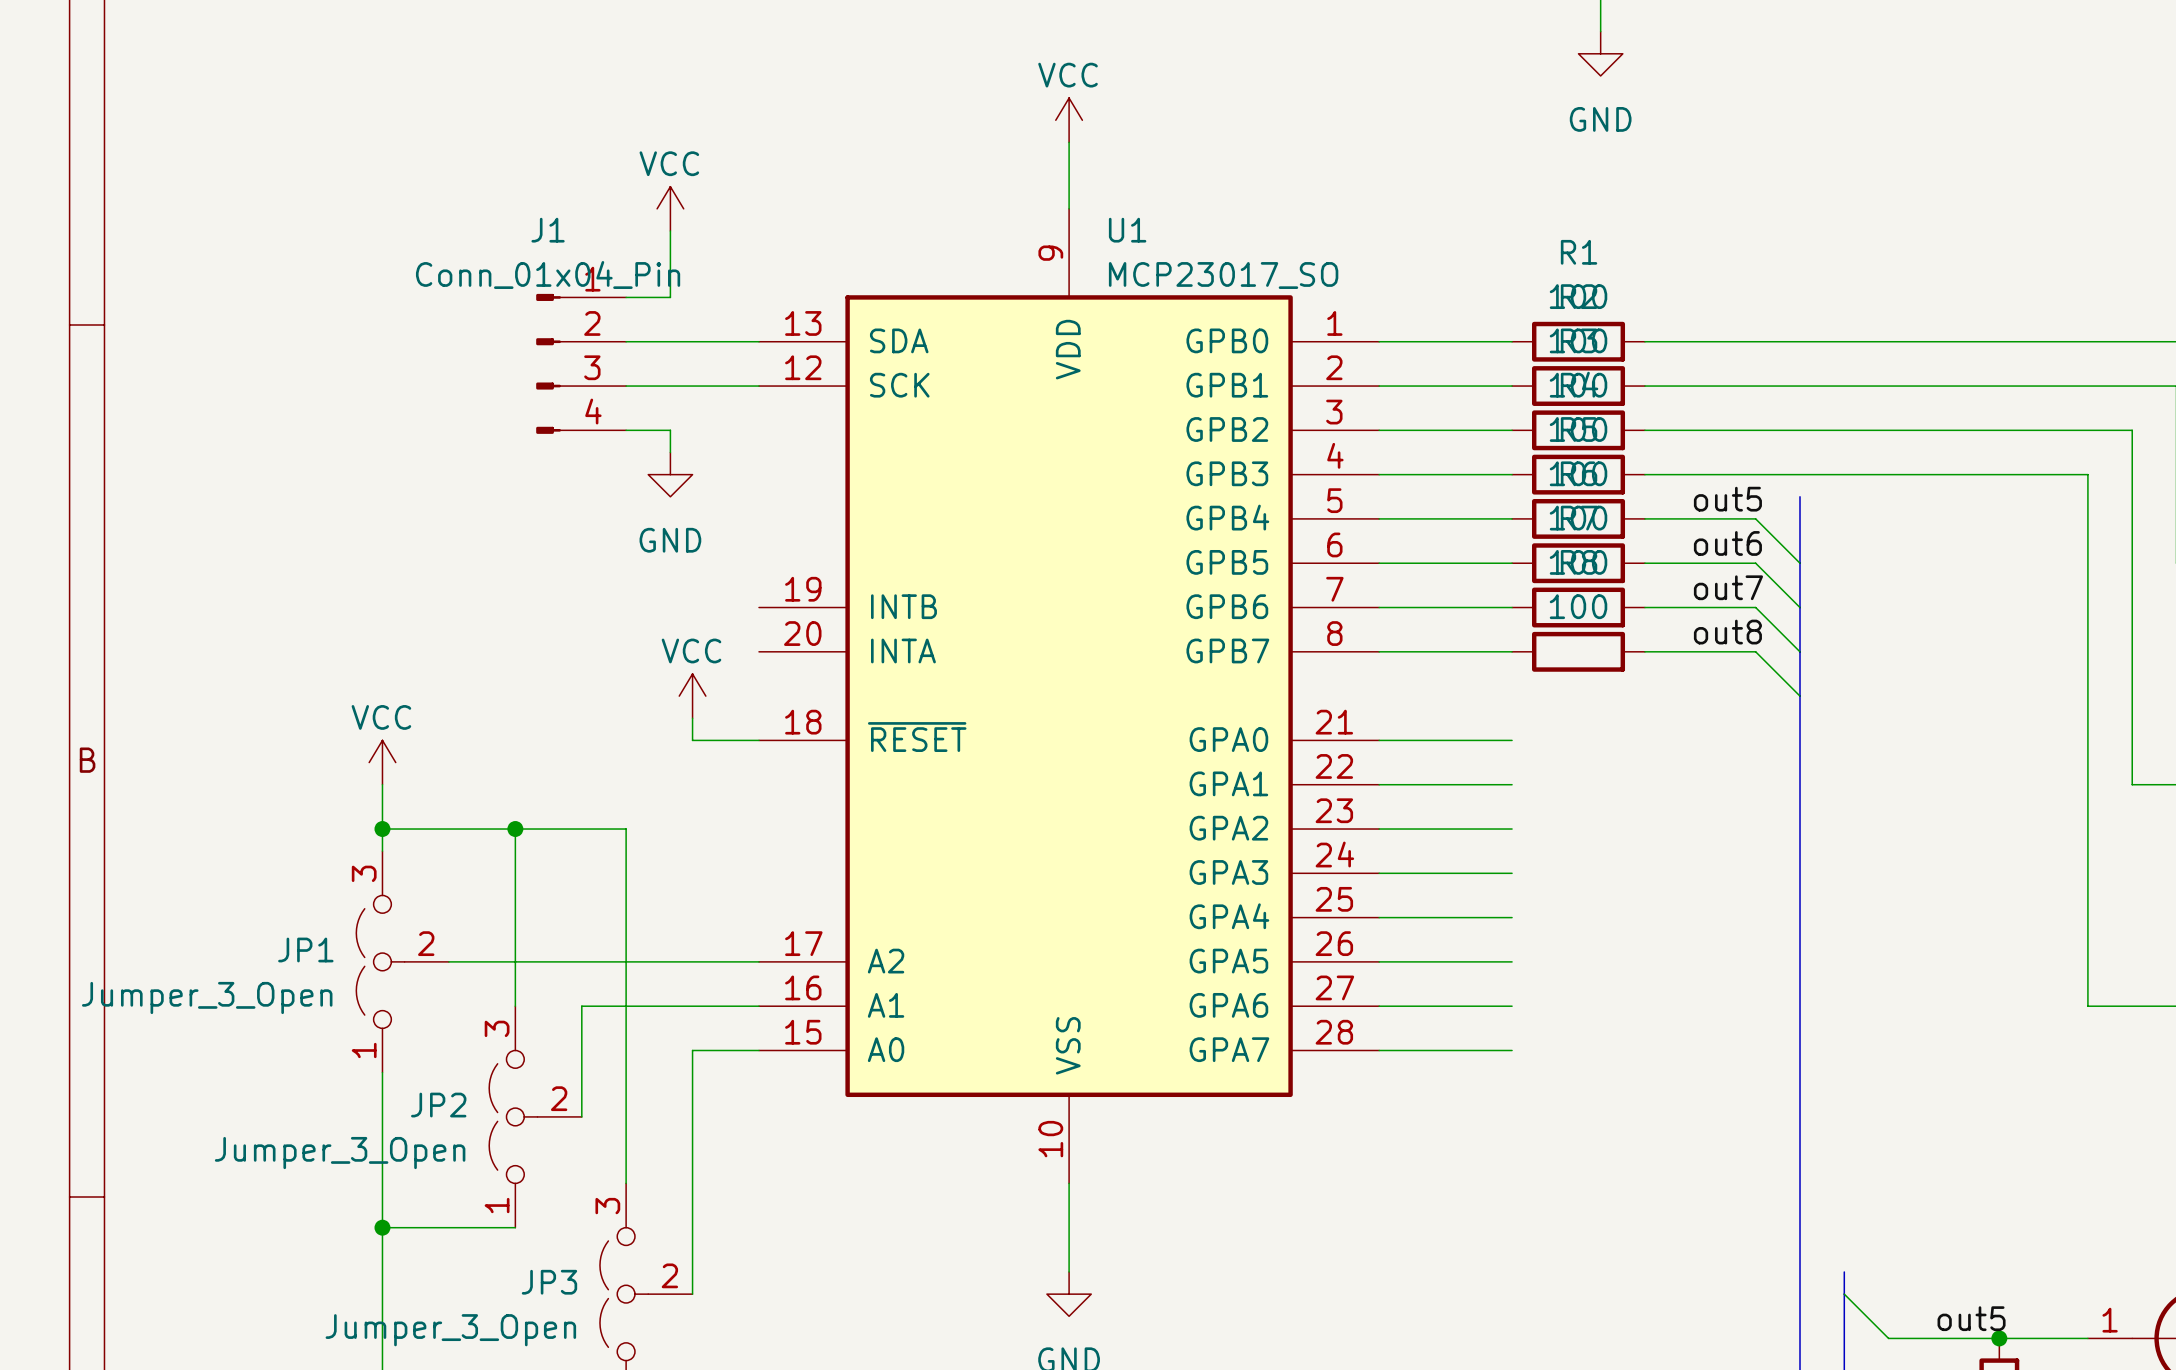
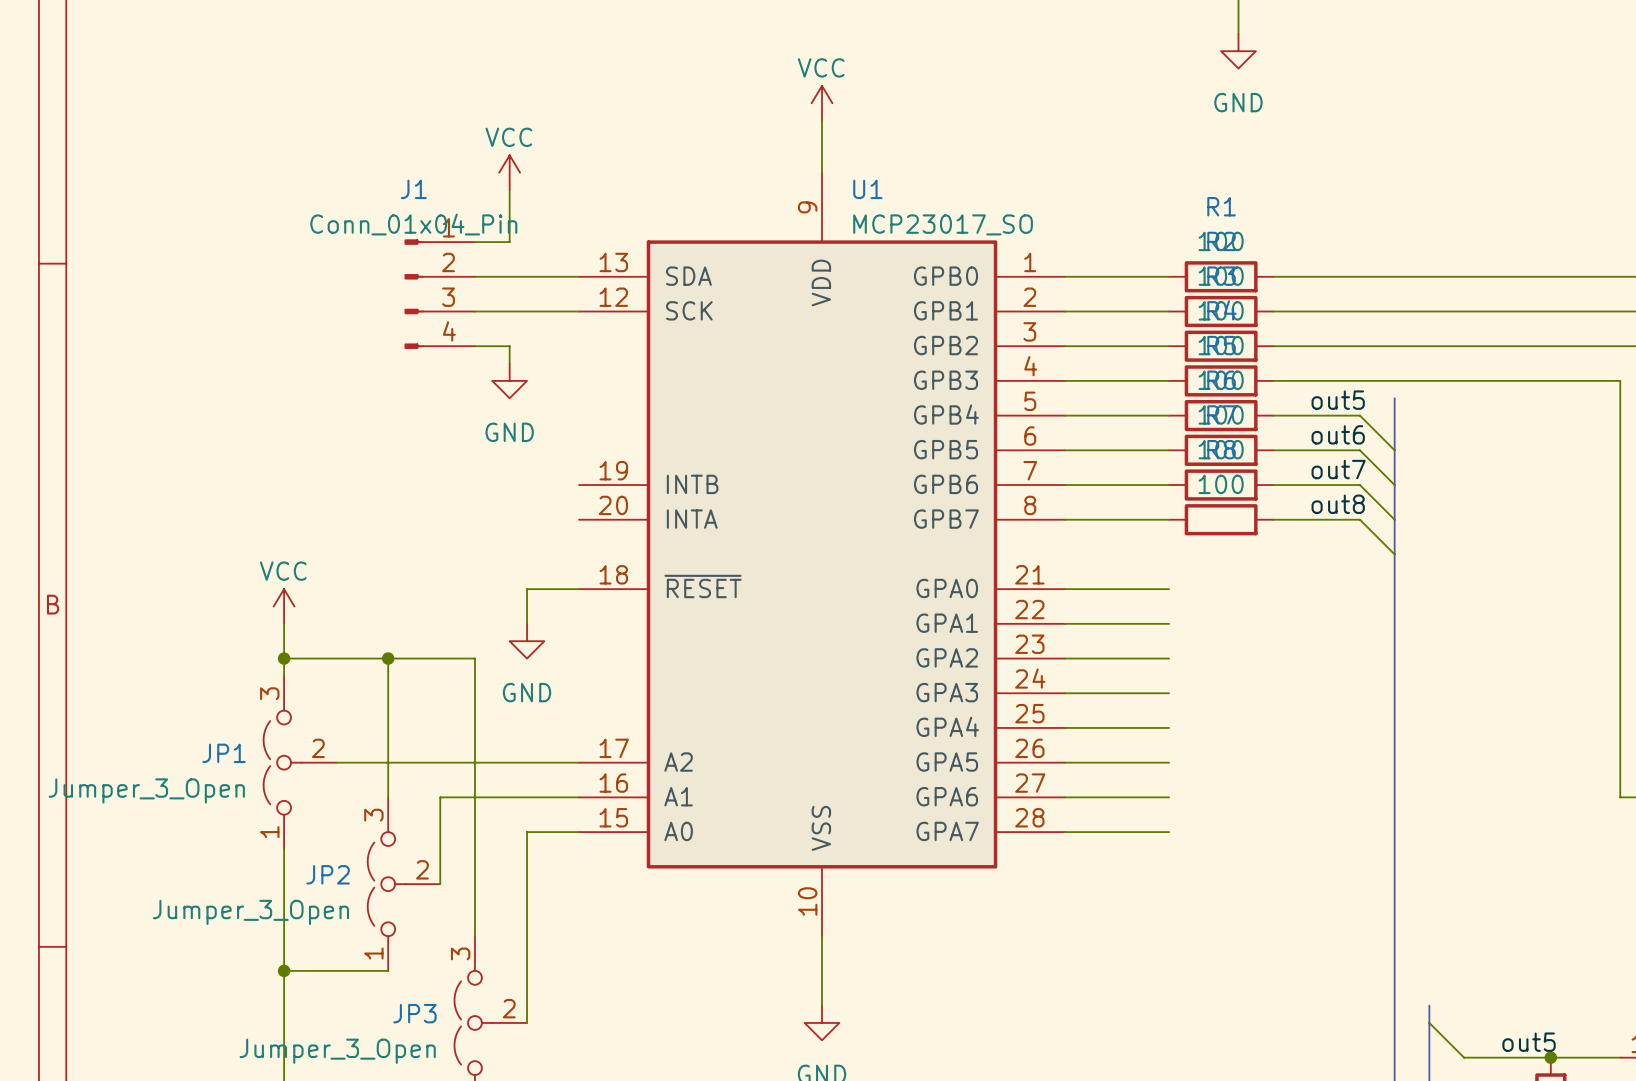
power symbol: VCC (692, 696) -> none
wire: (692, 718) (692, 740) -> (527, 623) (527, 589)
power symbol: none -> GND (527, 641)

